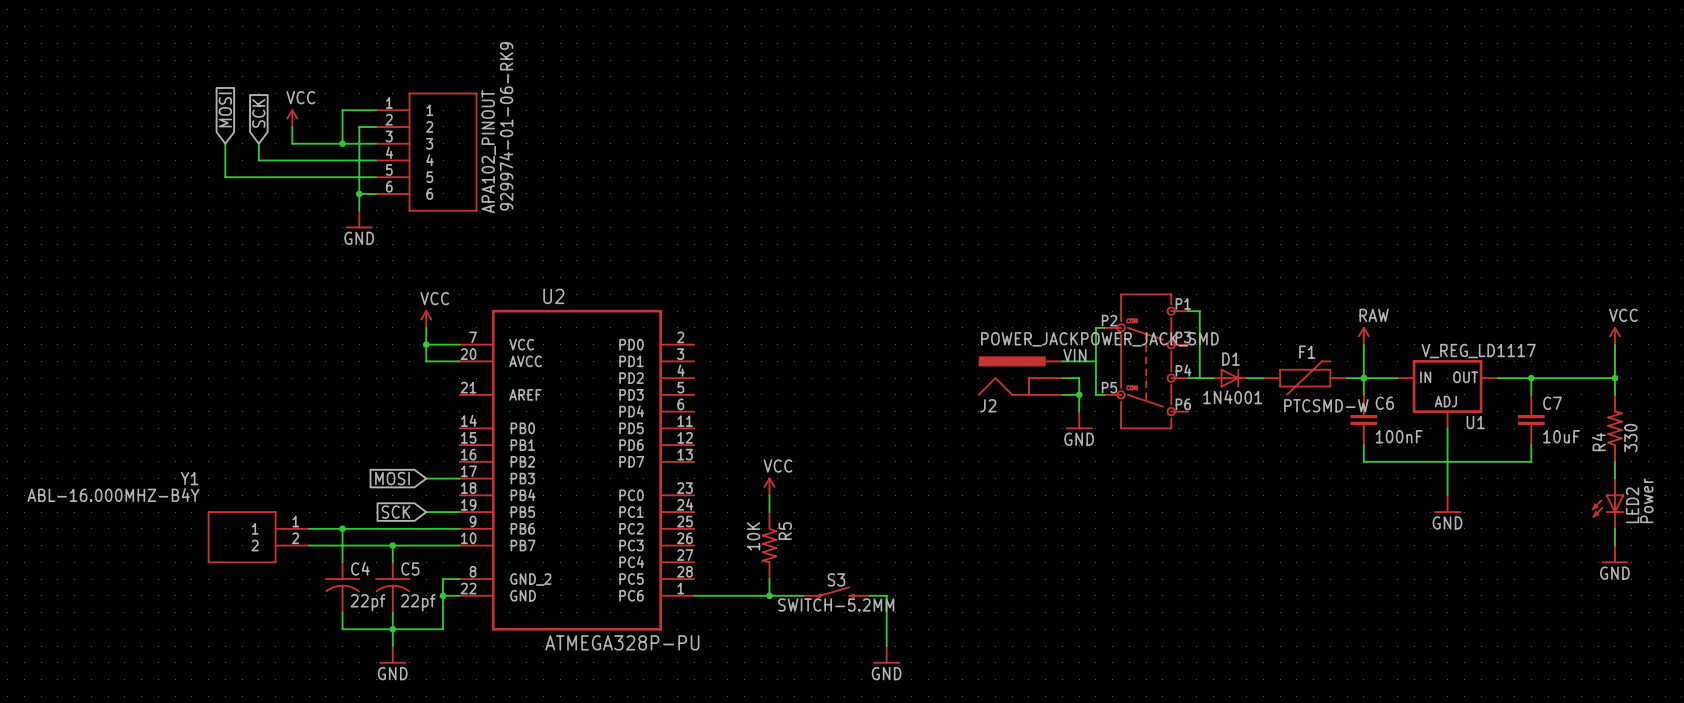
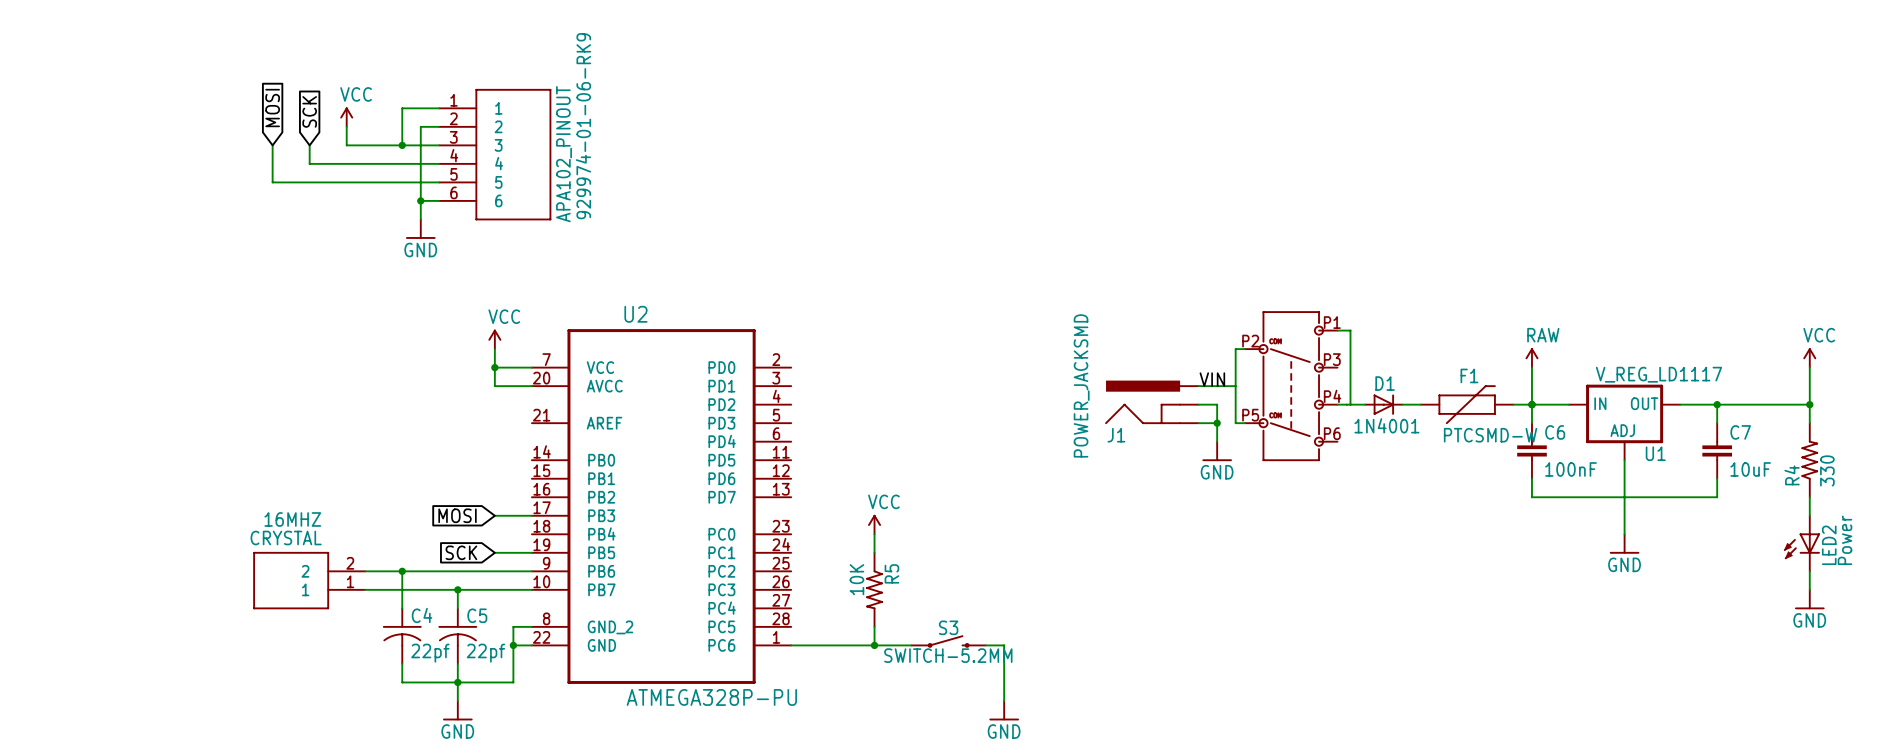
J2 value: POWER_JACKPOWER_JACK_SMD (1099, 339) -> POWER_JACKSMD (1081, 385)
J2 name: J2 (988, 405) -> J1 (1116, 435)
Y1 name: Y1 (189, 478) -> CRYSTAL (286, 538)
Y1 value: ABL-16.000MHZ-B4Y (113, 495) -> 16MHZ (292, 519)
Y1 flip: as is (242, 537) -> up-down (291, 580)

